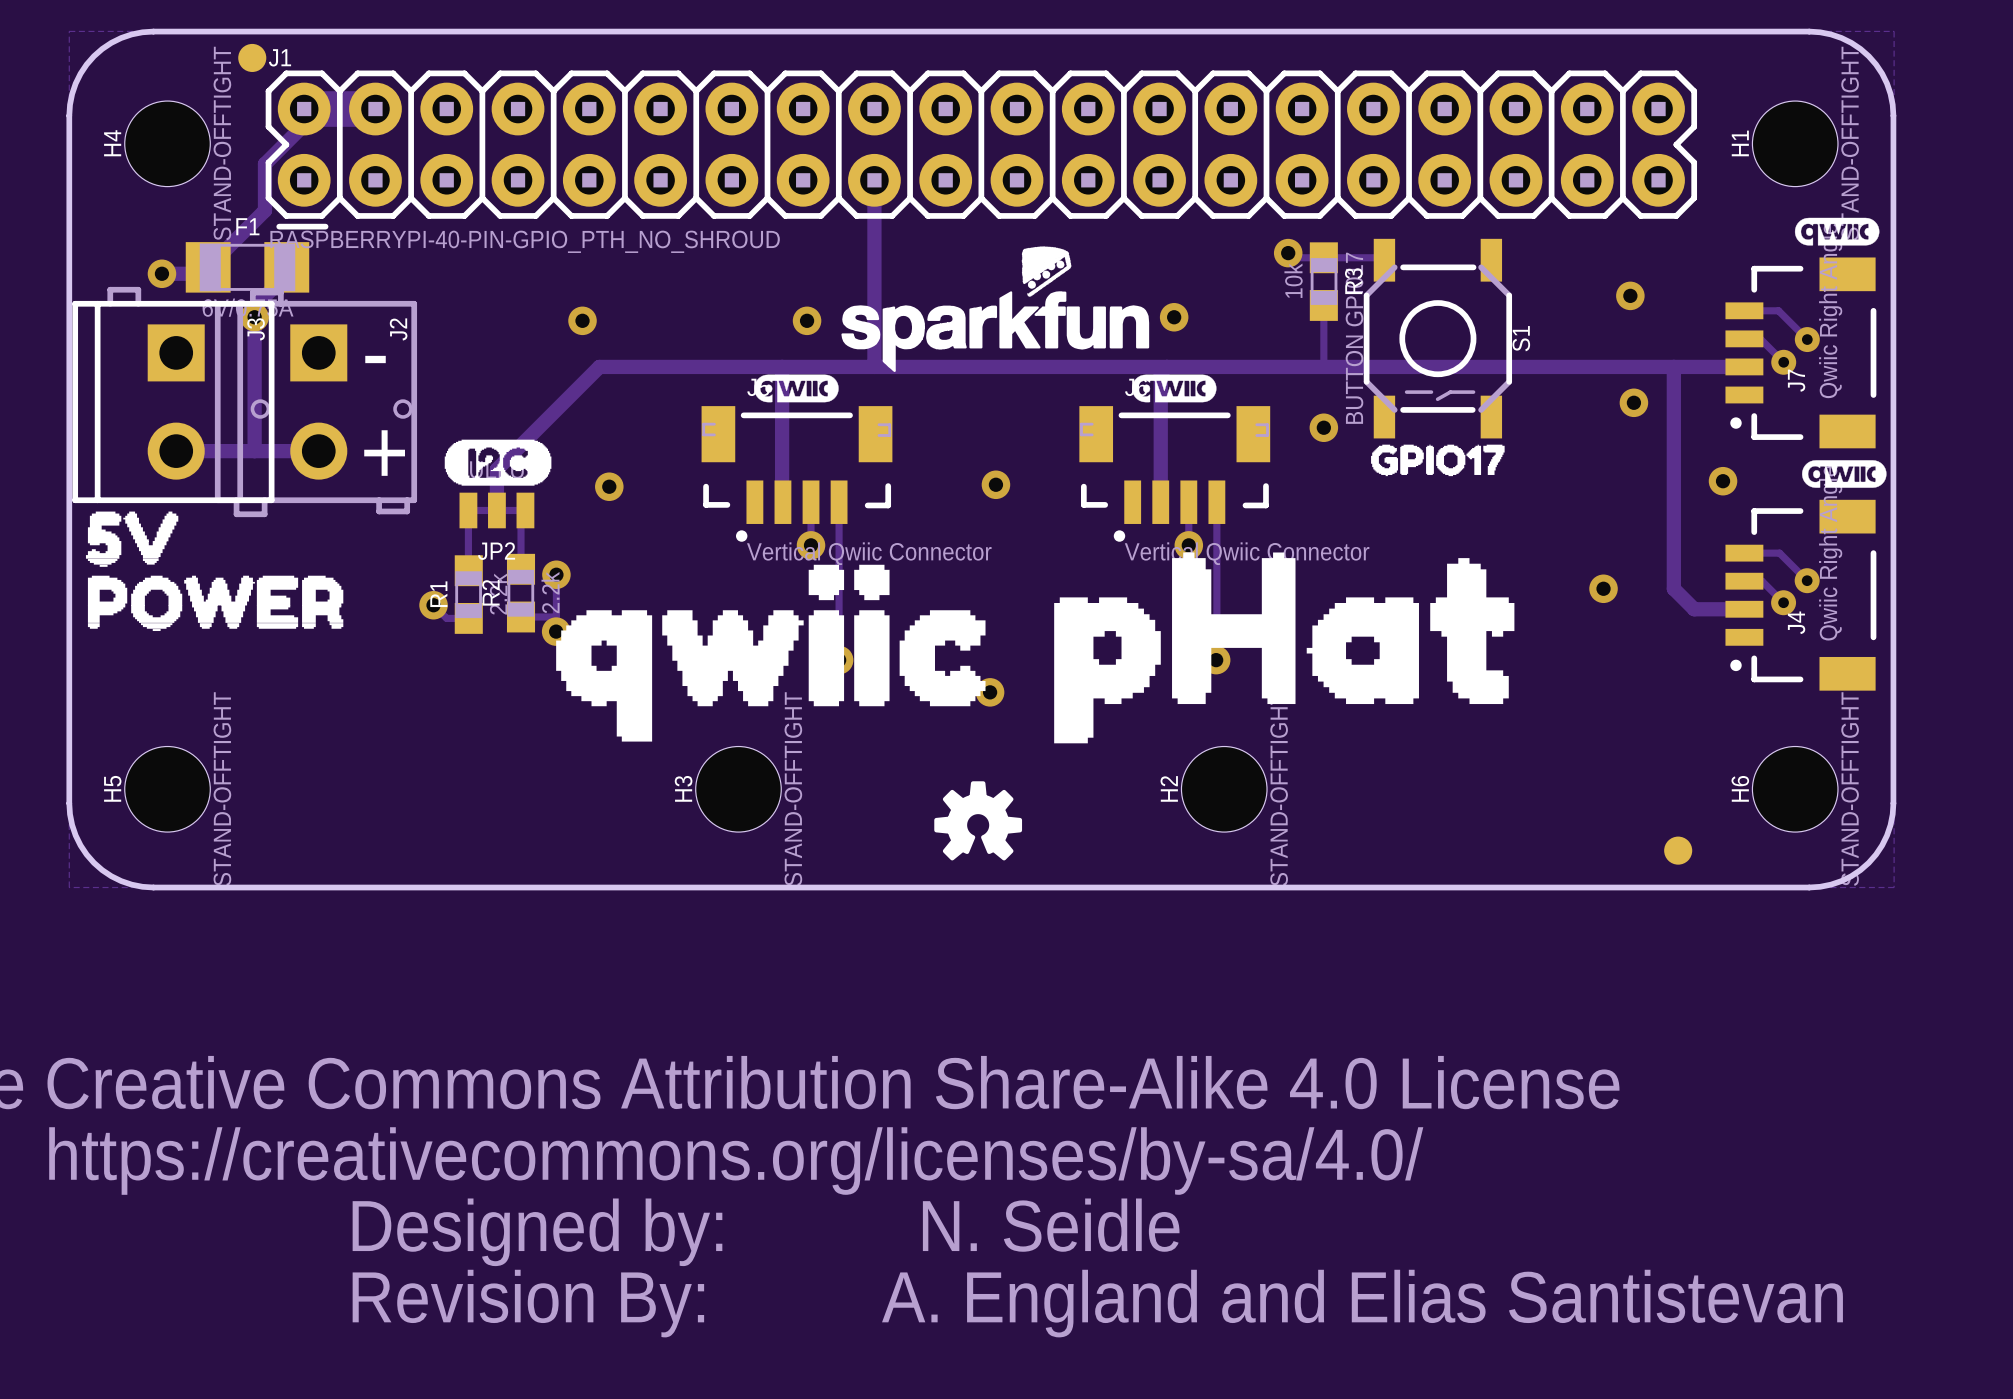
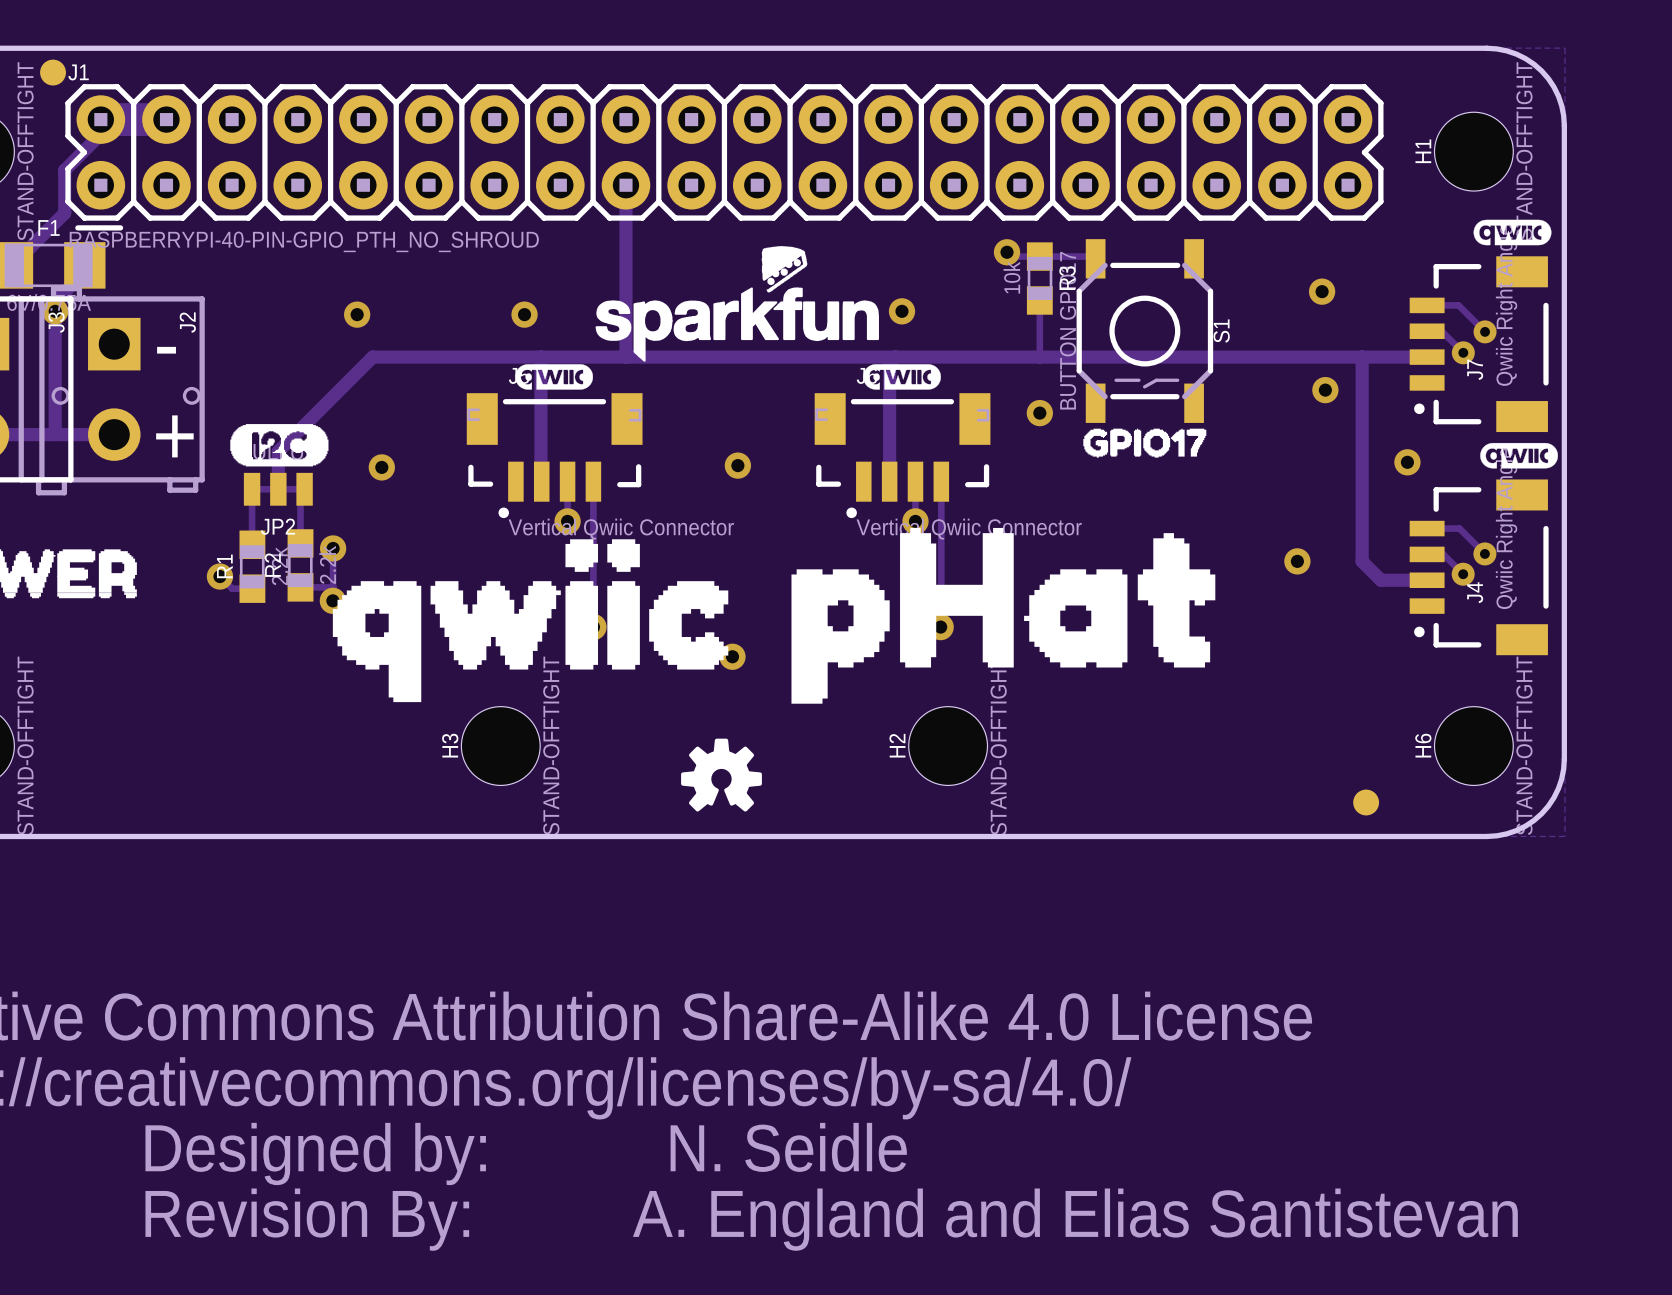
via position: (807, 320) -> (524, 314)

